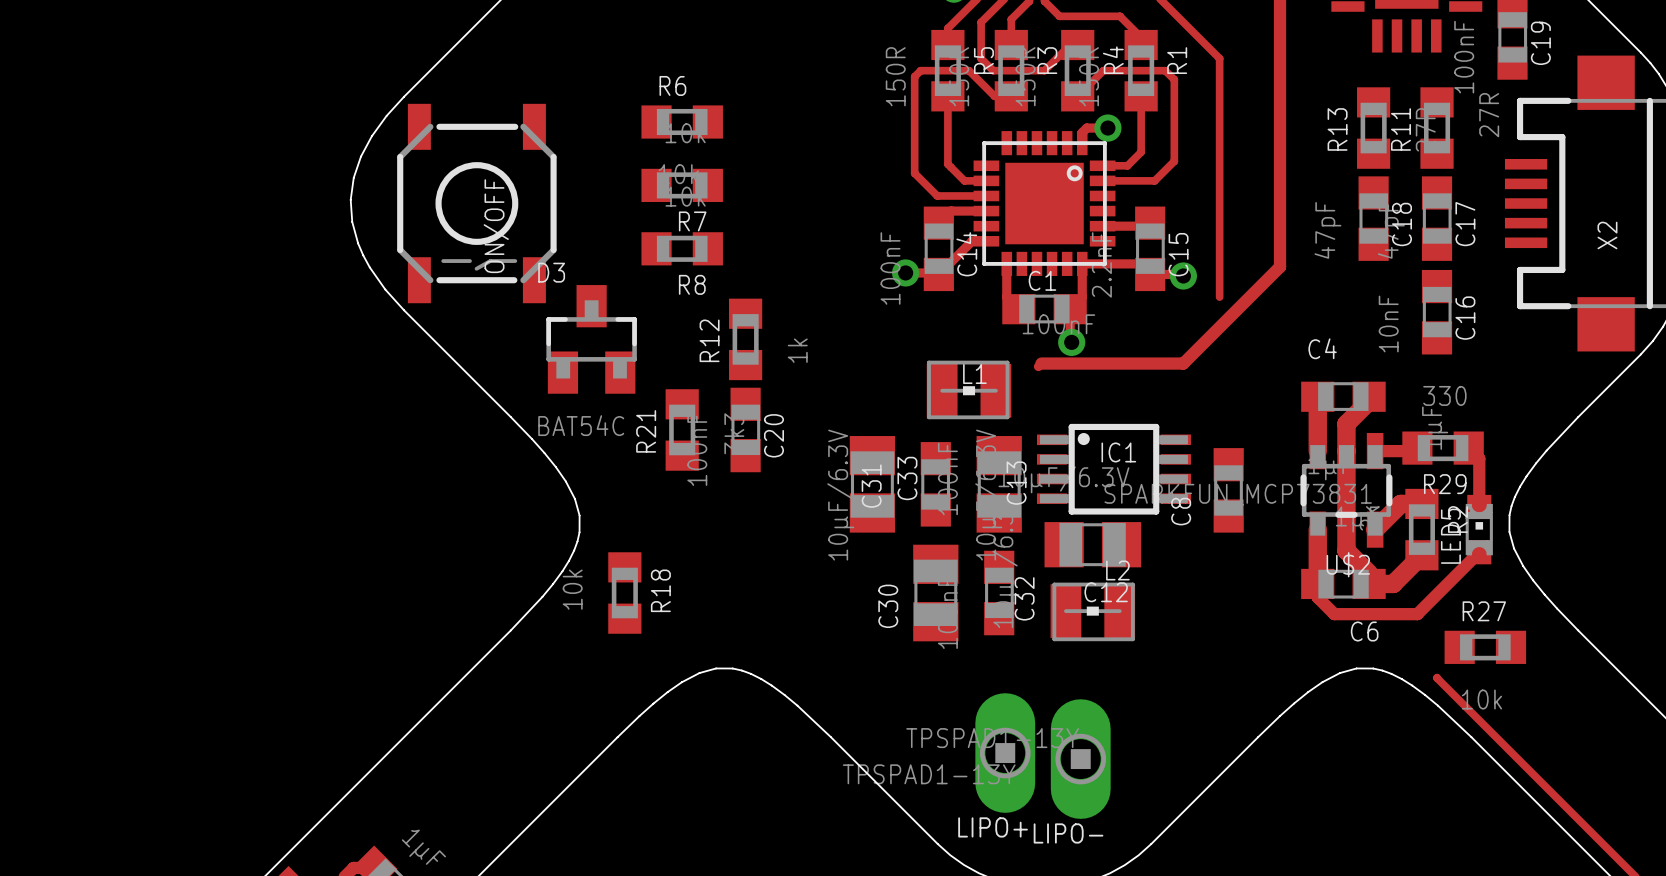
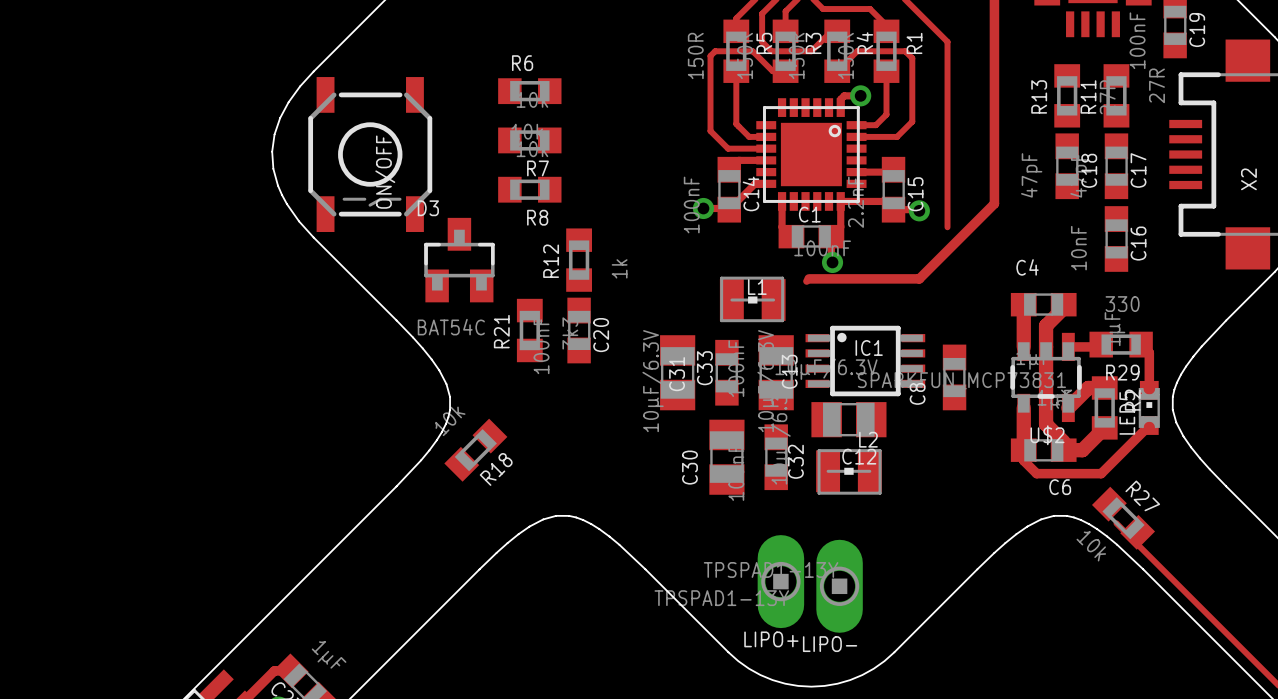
R18 rotation: 0° (624, 593) -> 45° clockwise (475, 450)
R27 rotation: 0° (1485, 647) -> 45° clockwise (1123, 518)

